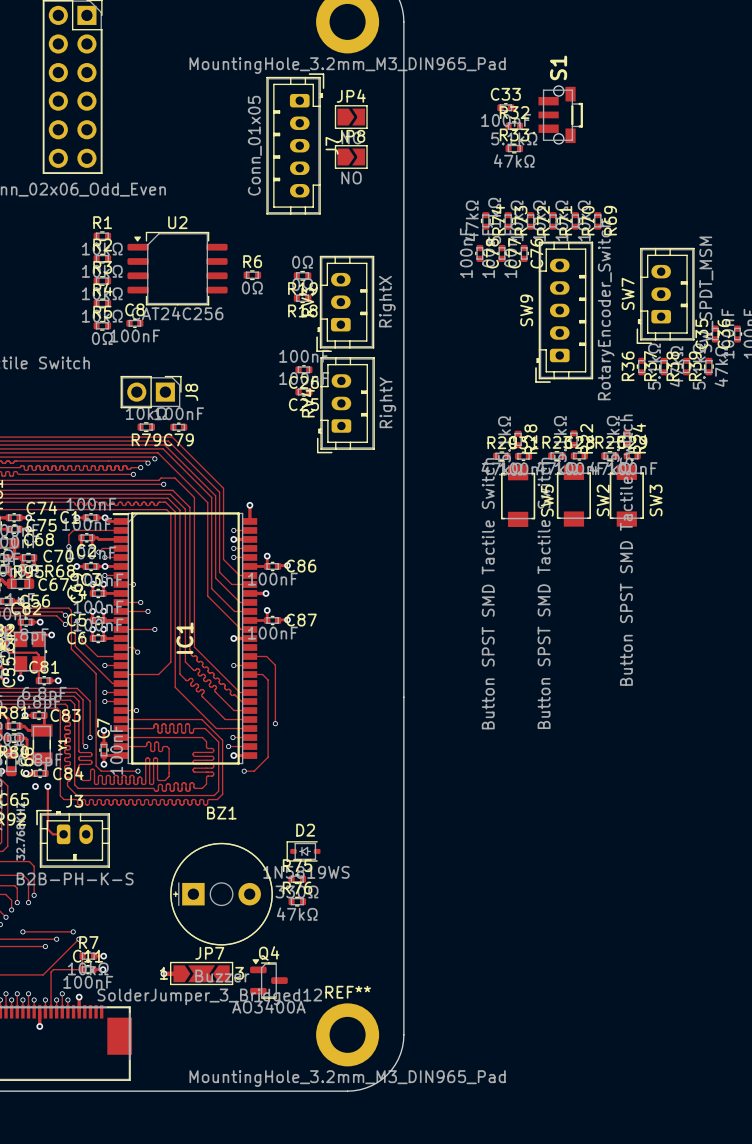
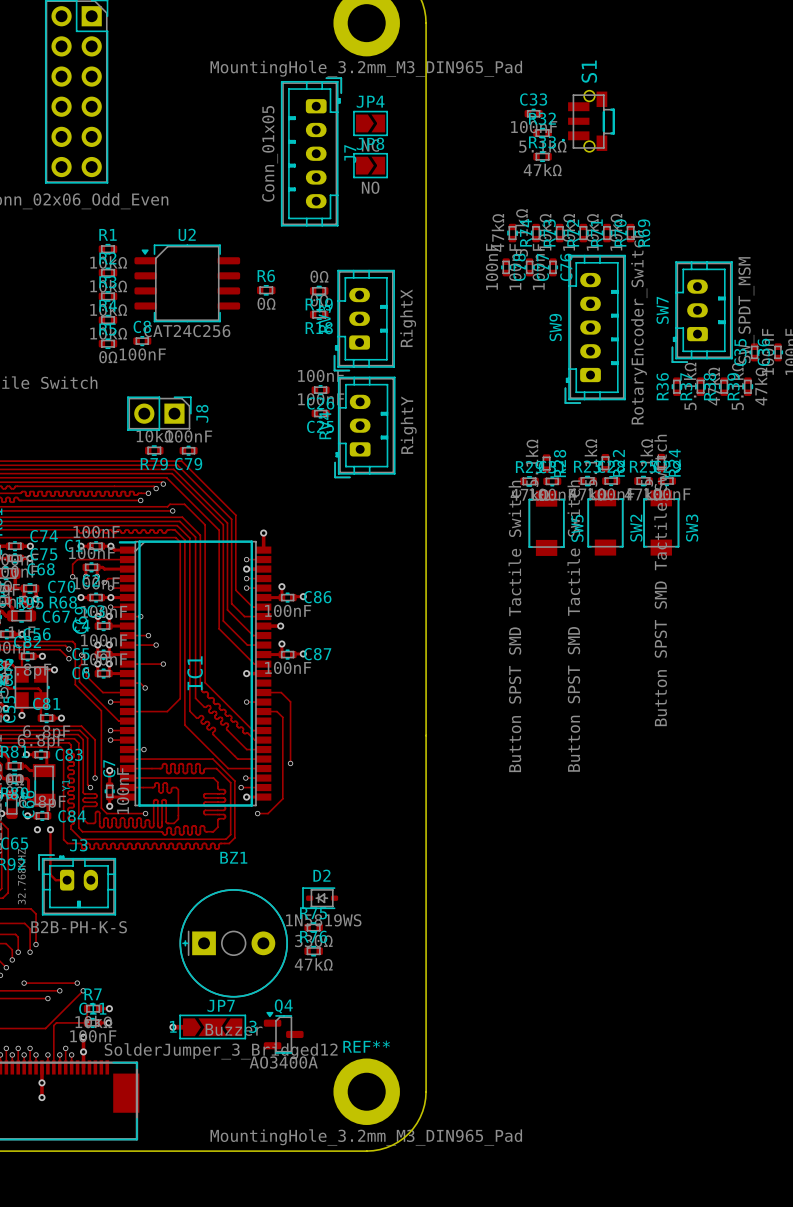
track: none -> (83, 1037) (83, 1051)
via: none -> (83, 1037)
track: none -> (41, 1082) (41, 1097)
via: none -> (41, 1097)

